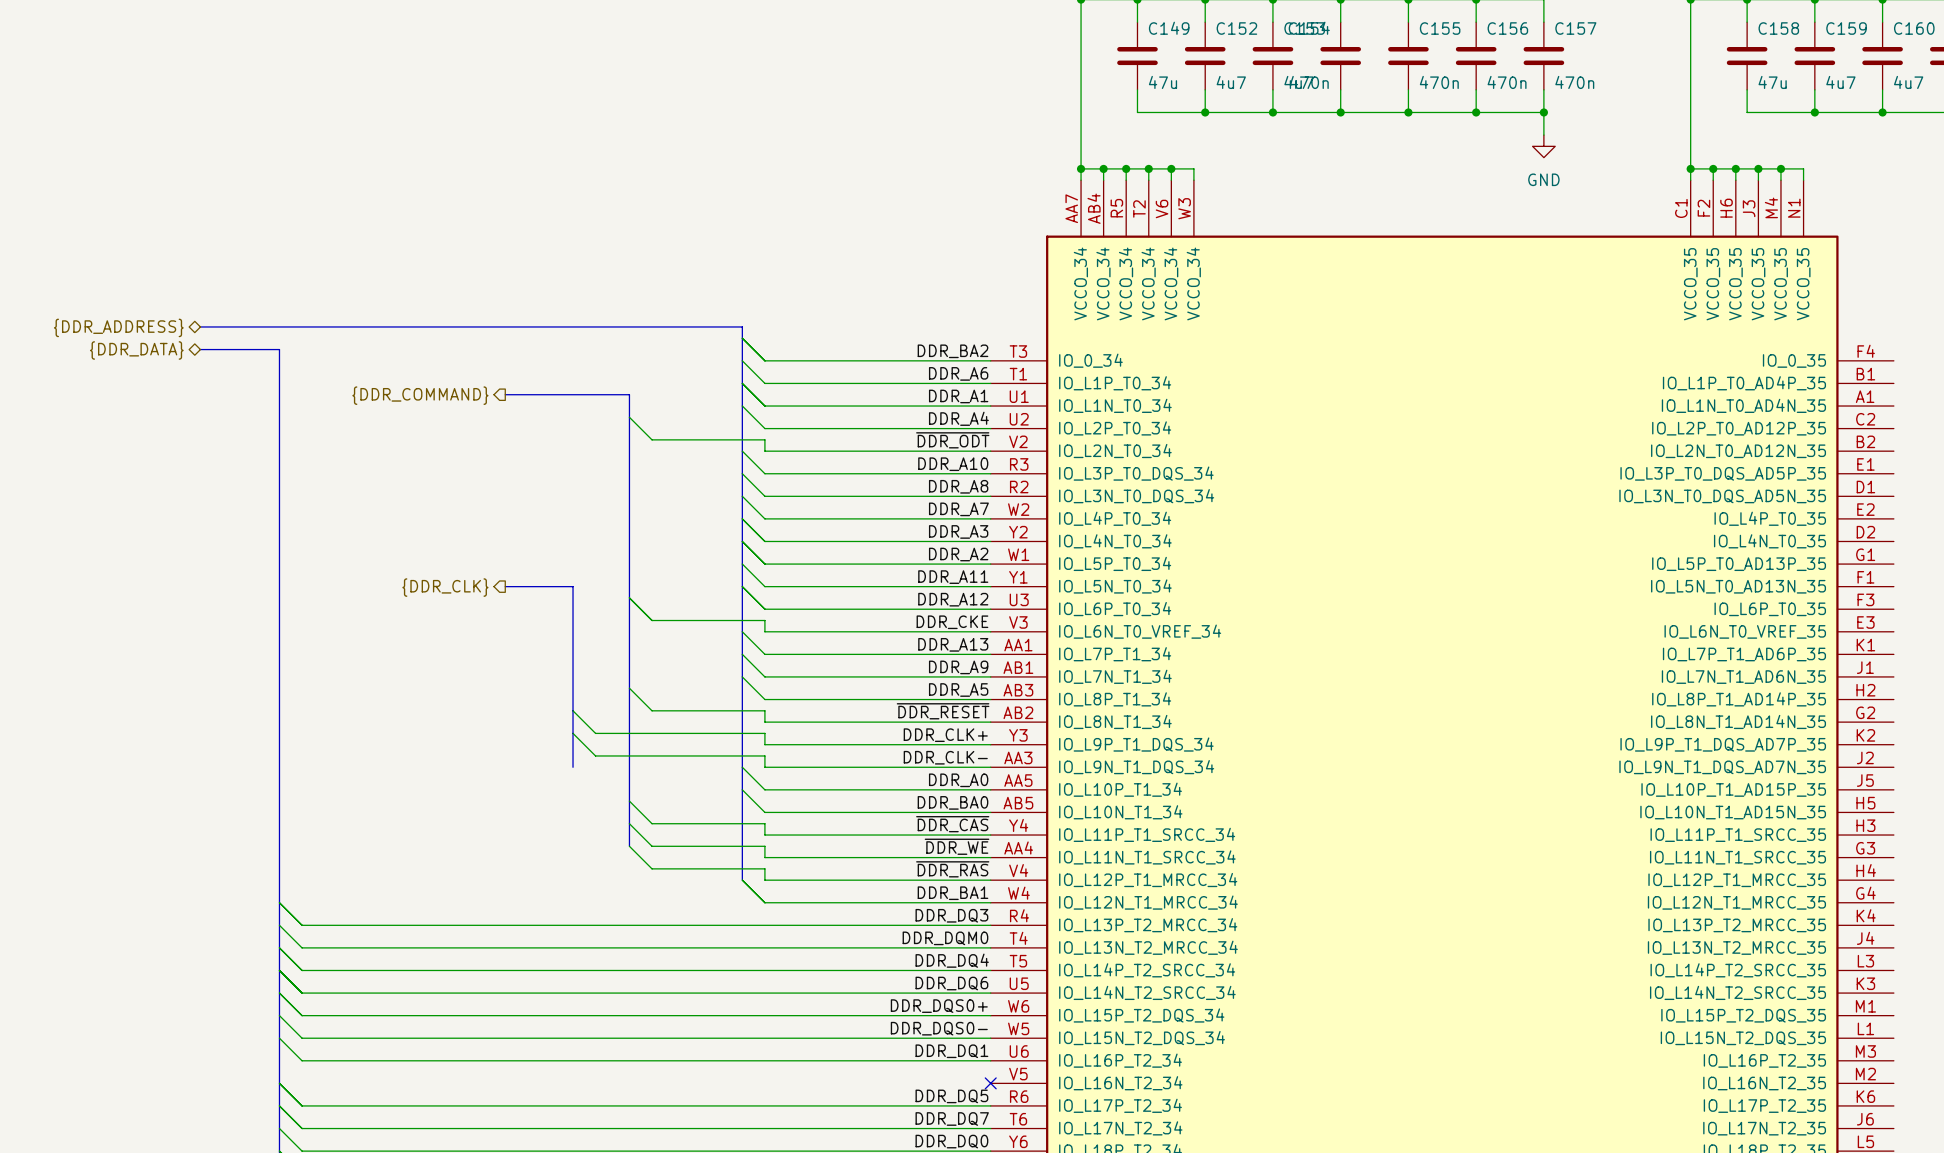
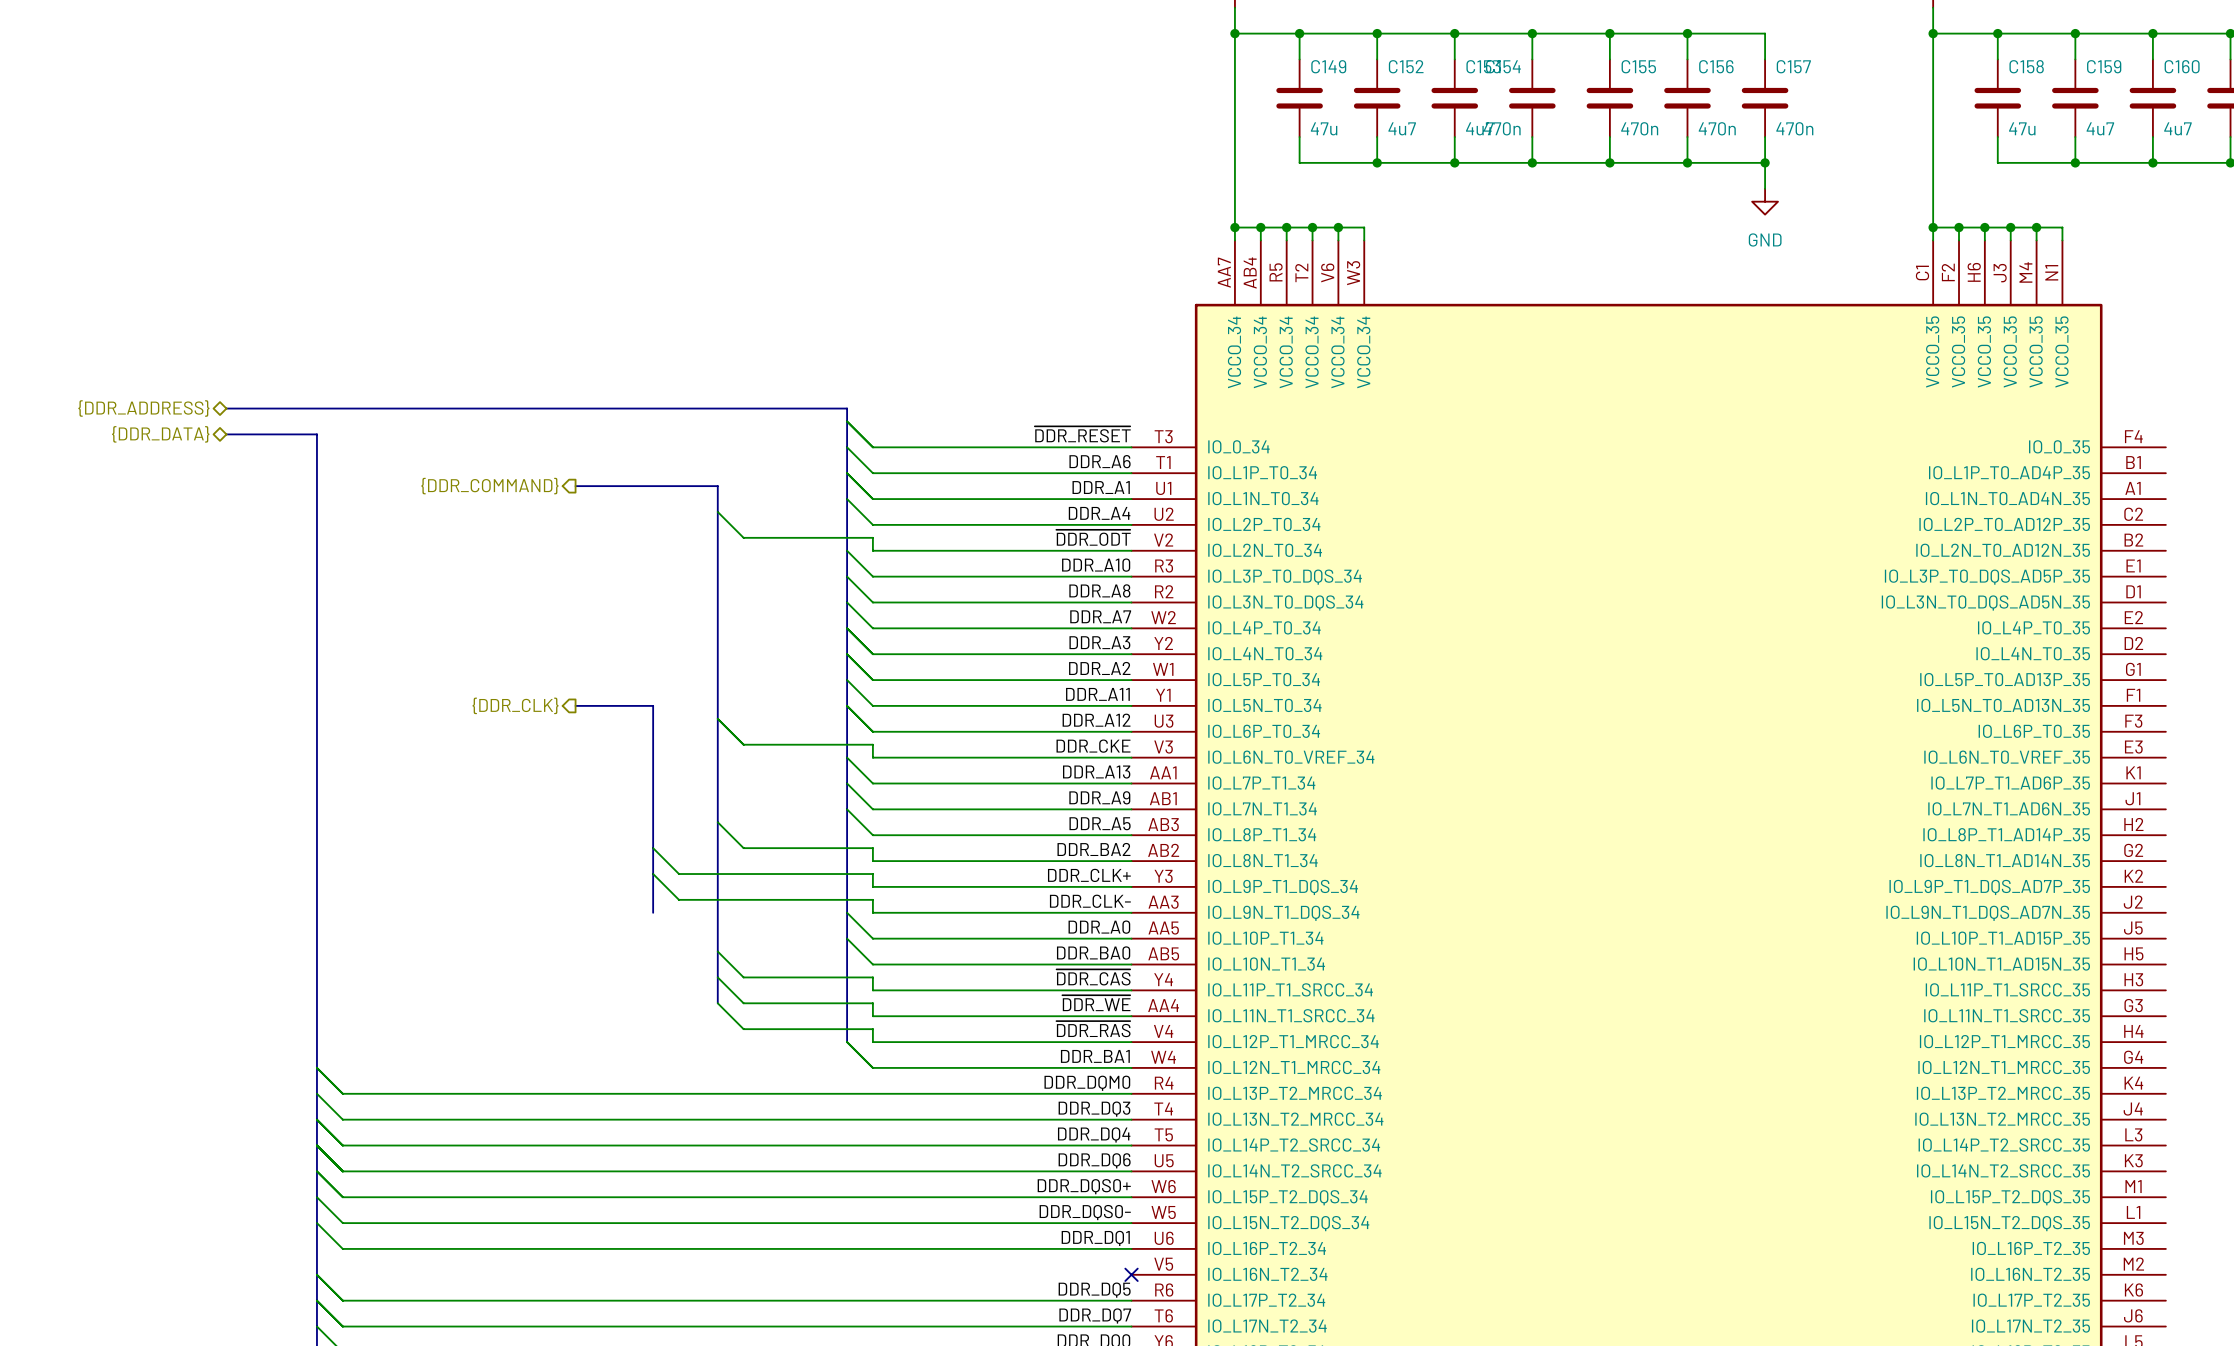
label: DDR_BA2 (953, 351) -> ~{DDR_RESET} (1082, 434)
label: ~{DDR_RESET} (943, 711) -> DDR_BA2 (1093, 849)
label: DDR_DQ3 (951, 915) -> DDR_DQM0 (1087, 1083)
label: DDR_DQM0 (945, 938) -> DDR_DQ3 (1094, 1109)

